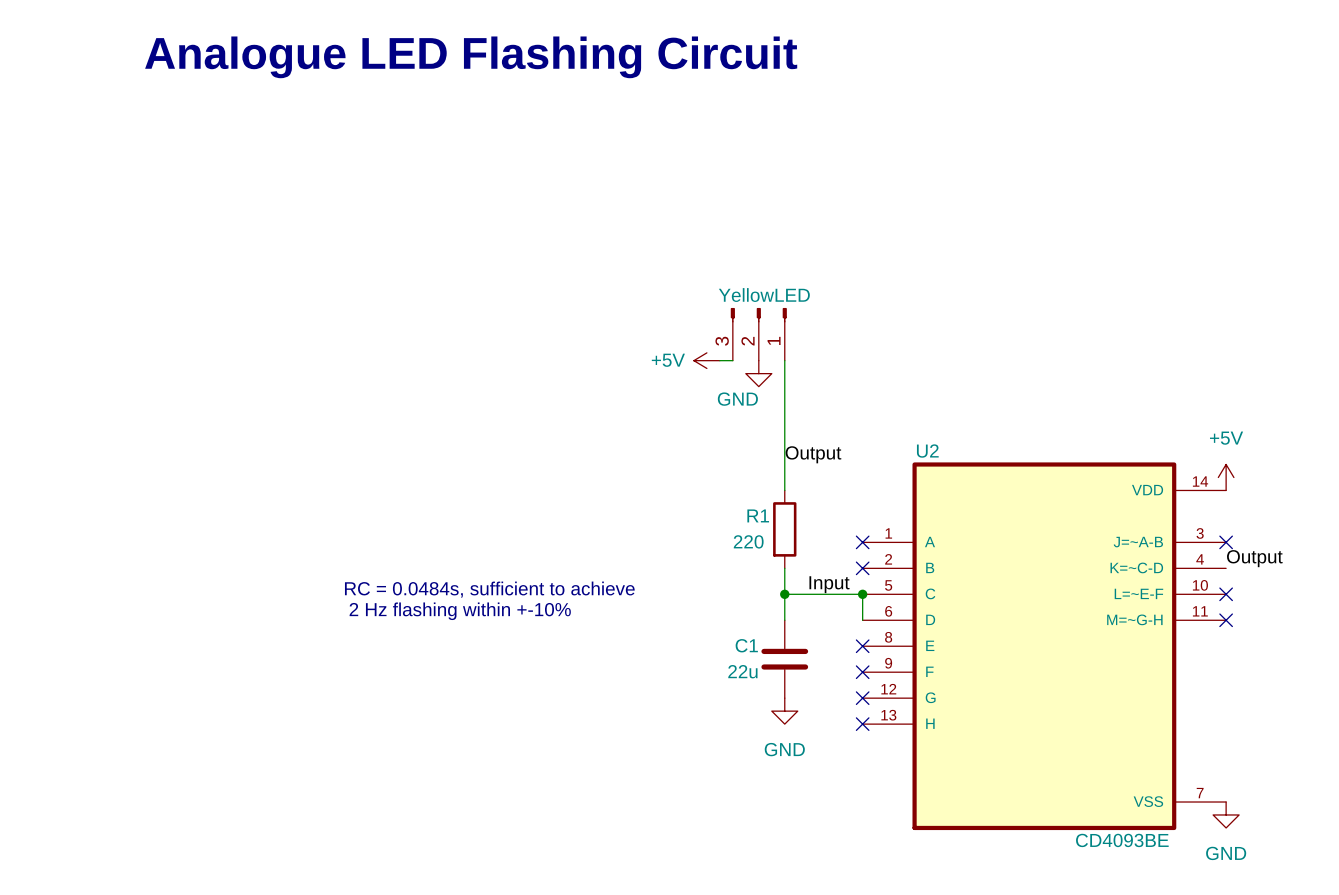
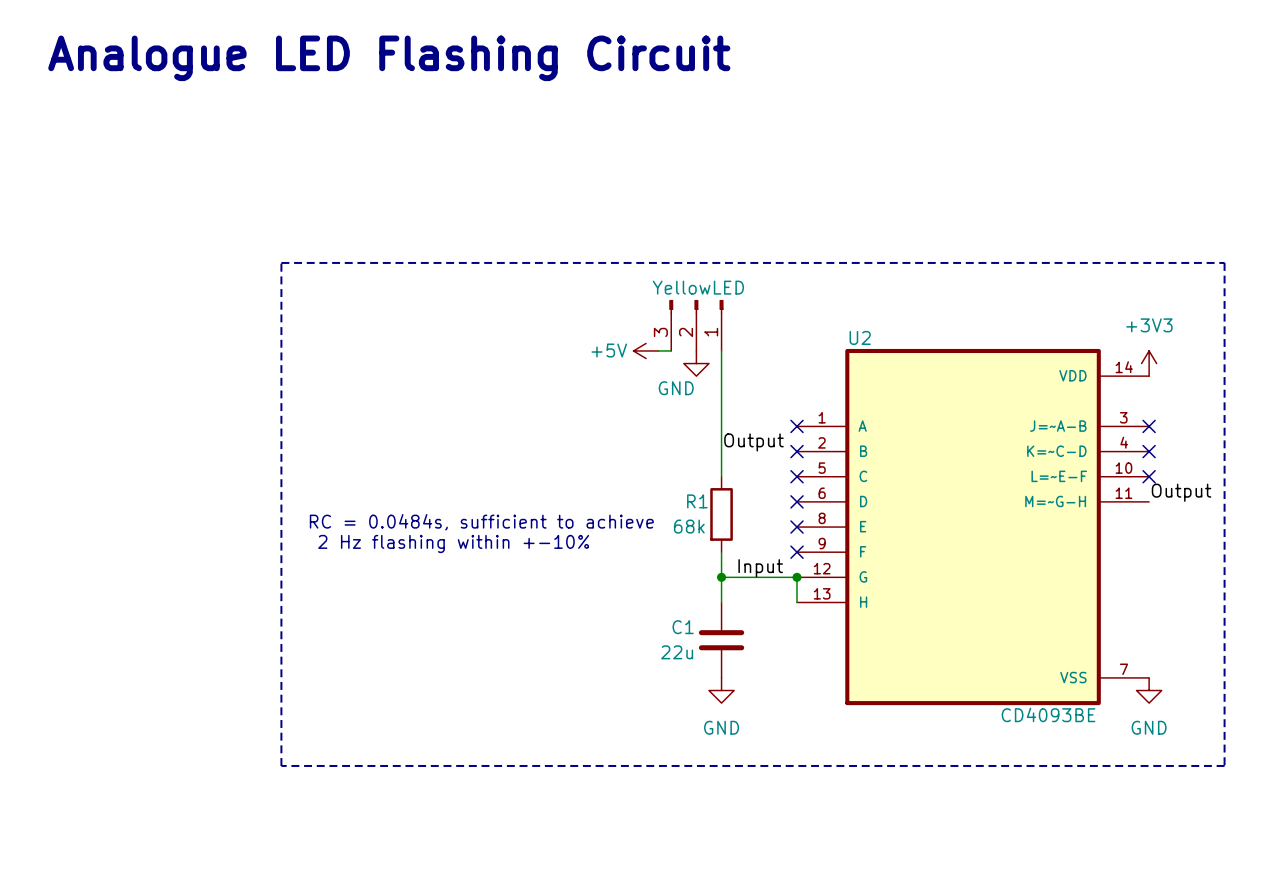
line: none -> (281, 262) (1224, 262) (1224, 765) (281, 765) (281, 262)
power symbol: none -> +3V3 (1149, 363)
no-connect mark: none -> (797, 426)
no-connect mark: none -> (1149, 426)
no-connect mark: none -> (797, 451)
no-connect mark: none -> (1149, 451)
power symbol: +5V (1226, 477) -> none
no-connect mark: none -> (797, 476)
no-connect mark: none -> (1149, 476)
no-connect mark: none -> (797, 501)
R1 value: 220 (748, 541) -> 68k (689, 526)
no-connect mark: (1226, 542) -> none
label position: Output (1254, 558) -> Output (1181, 492)
text position: RC = 0.0484s, sufficient to achieve (489, 589) -> RC = 0.0484s, sufficient to achieve (481, 522)
no-connect mark: (1226, 594) -> none
text position: 2 Hz flashing within +-10% (460, 611) -> 2 Hz flashing within +-10% (453, 543)
no-connect mark: (1226, 620) -> none
no-connect mark: (862, 646) -> none
U2 position: (1044, 646) -> (973, 527)
no-connect mark: (862, 672) -> none
no-connect mark: (862, 698) -> none
no-connect mark: (862, 724) -> none
power symbol position: GND (1226, 814) -> GND (1149, 690)

